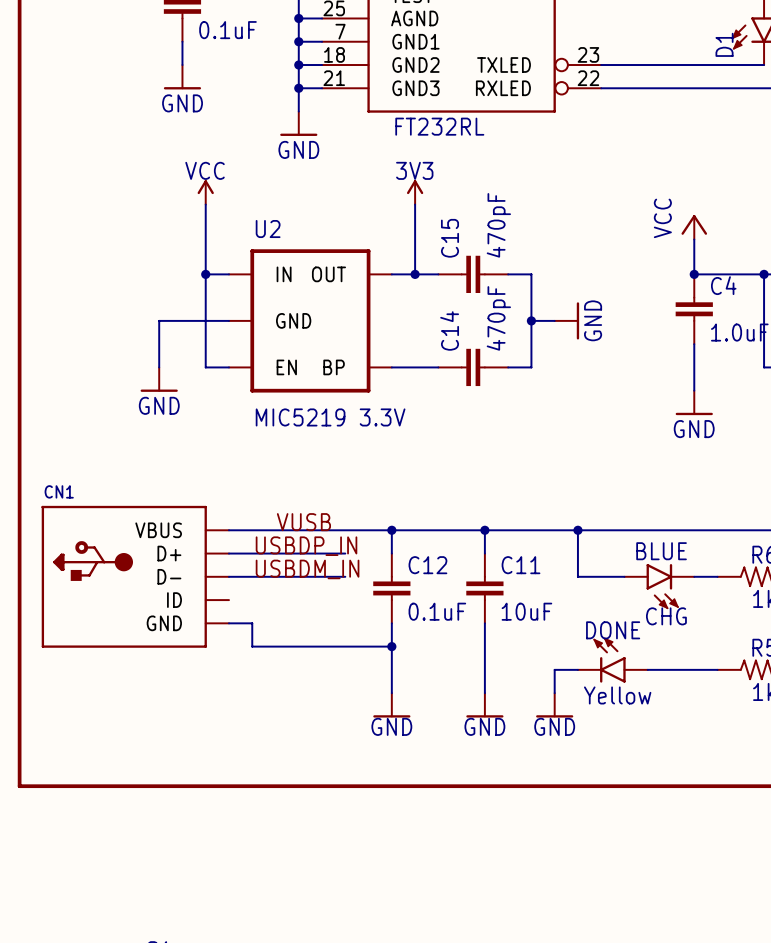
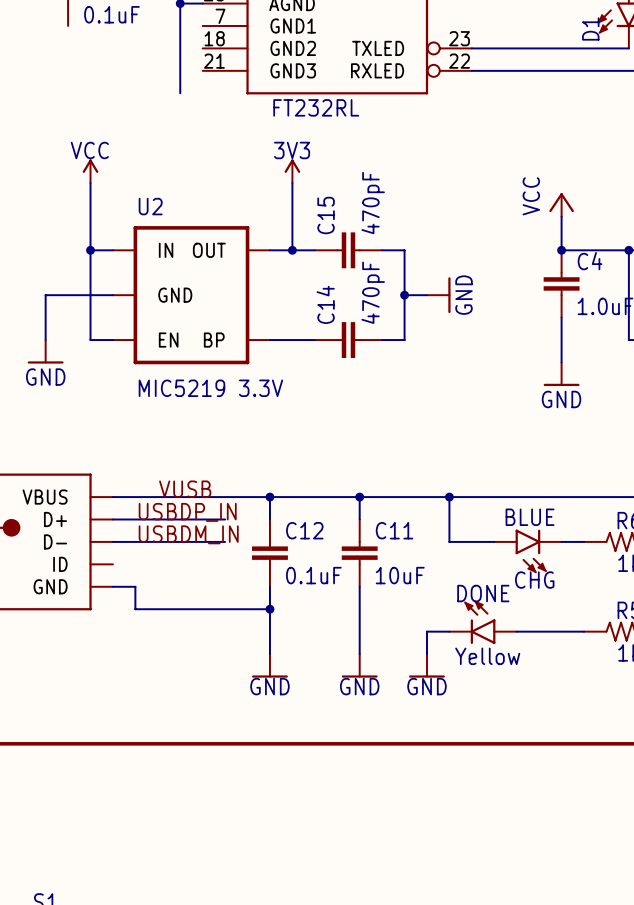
wire: (182, 41) (182, 65) -> none
wire: (298, 41) (322, 41) -> none
junction: (298, 41) -> none
wire: (298, 65) (322, 65) -> none
junction: (298, 65) -> none
power symbol: GND (182, 77) -> none
wire: (298, 88) (322, 88) -> none
junction: (298, 88) -> none
power symbol: GND (298, 123) -> none

